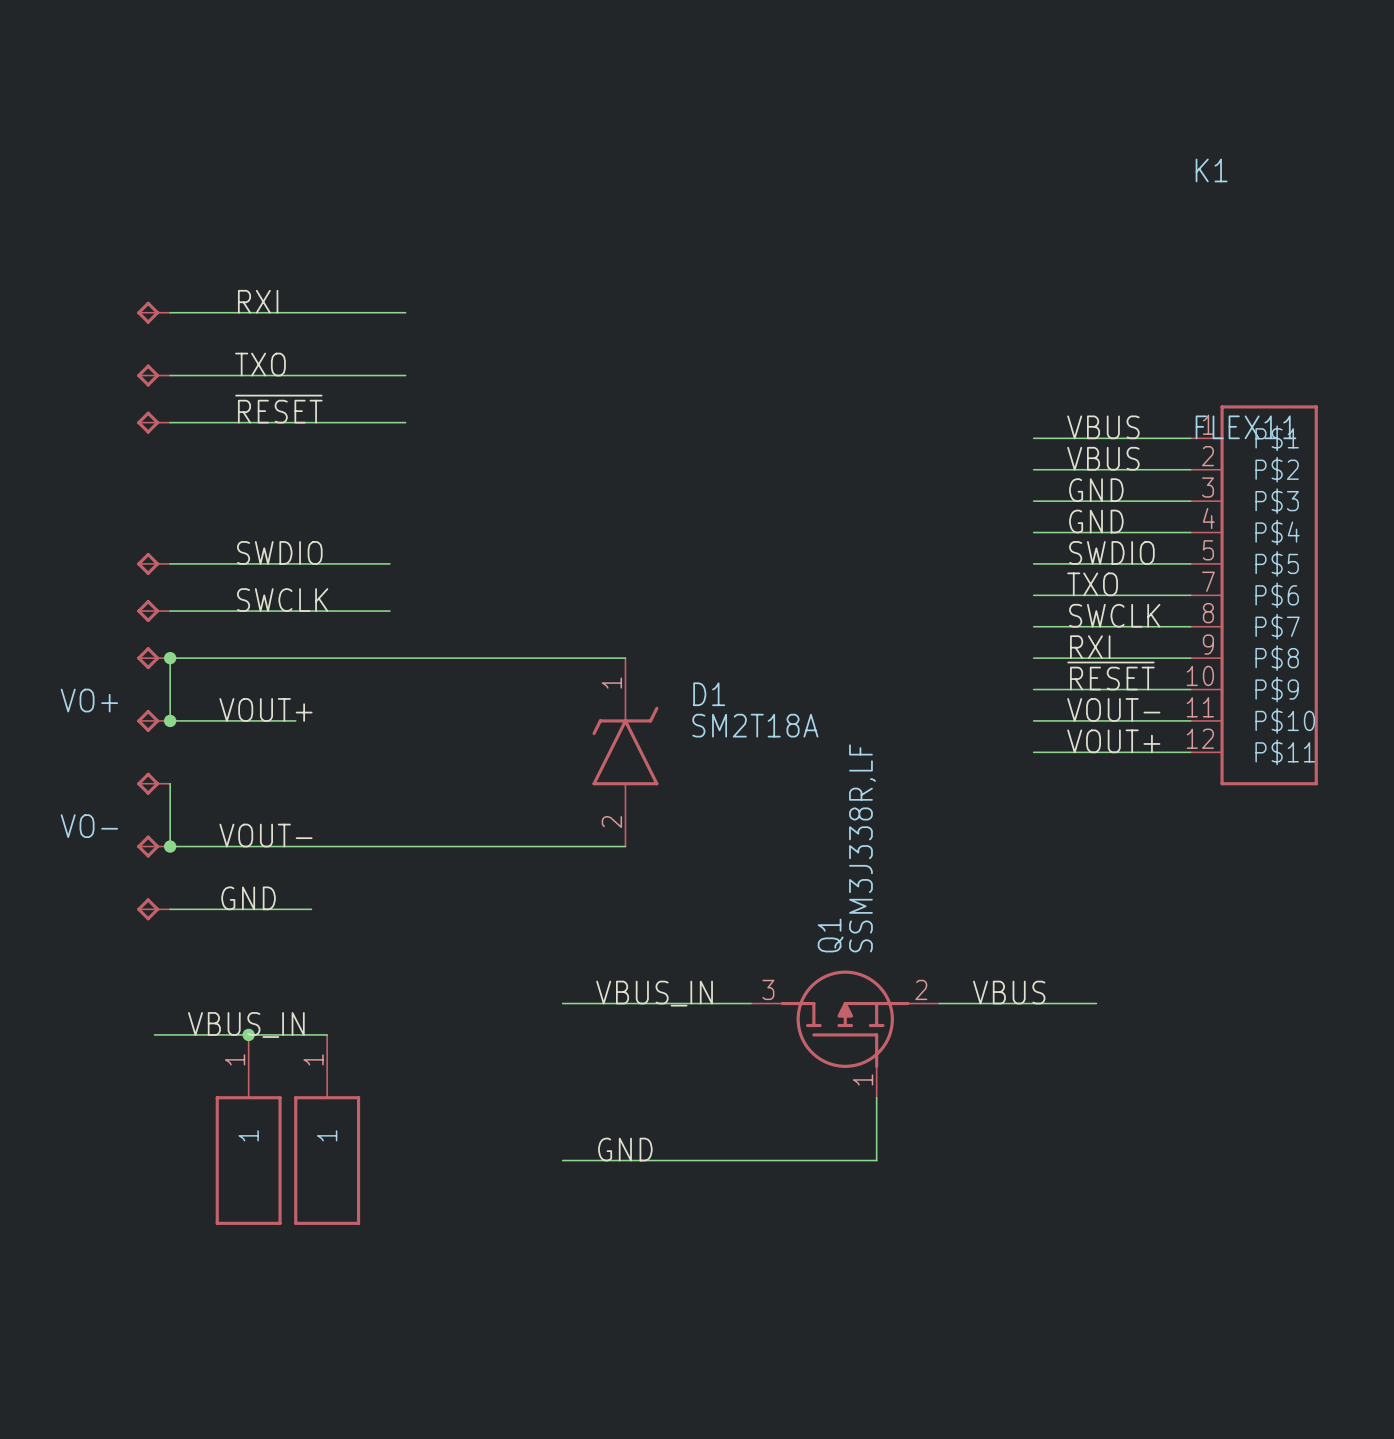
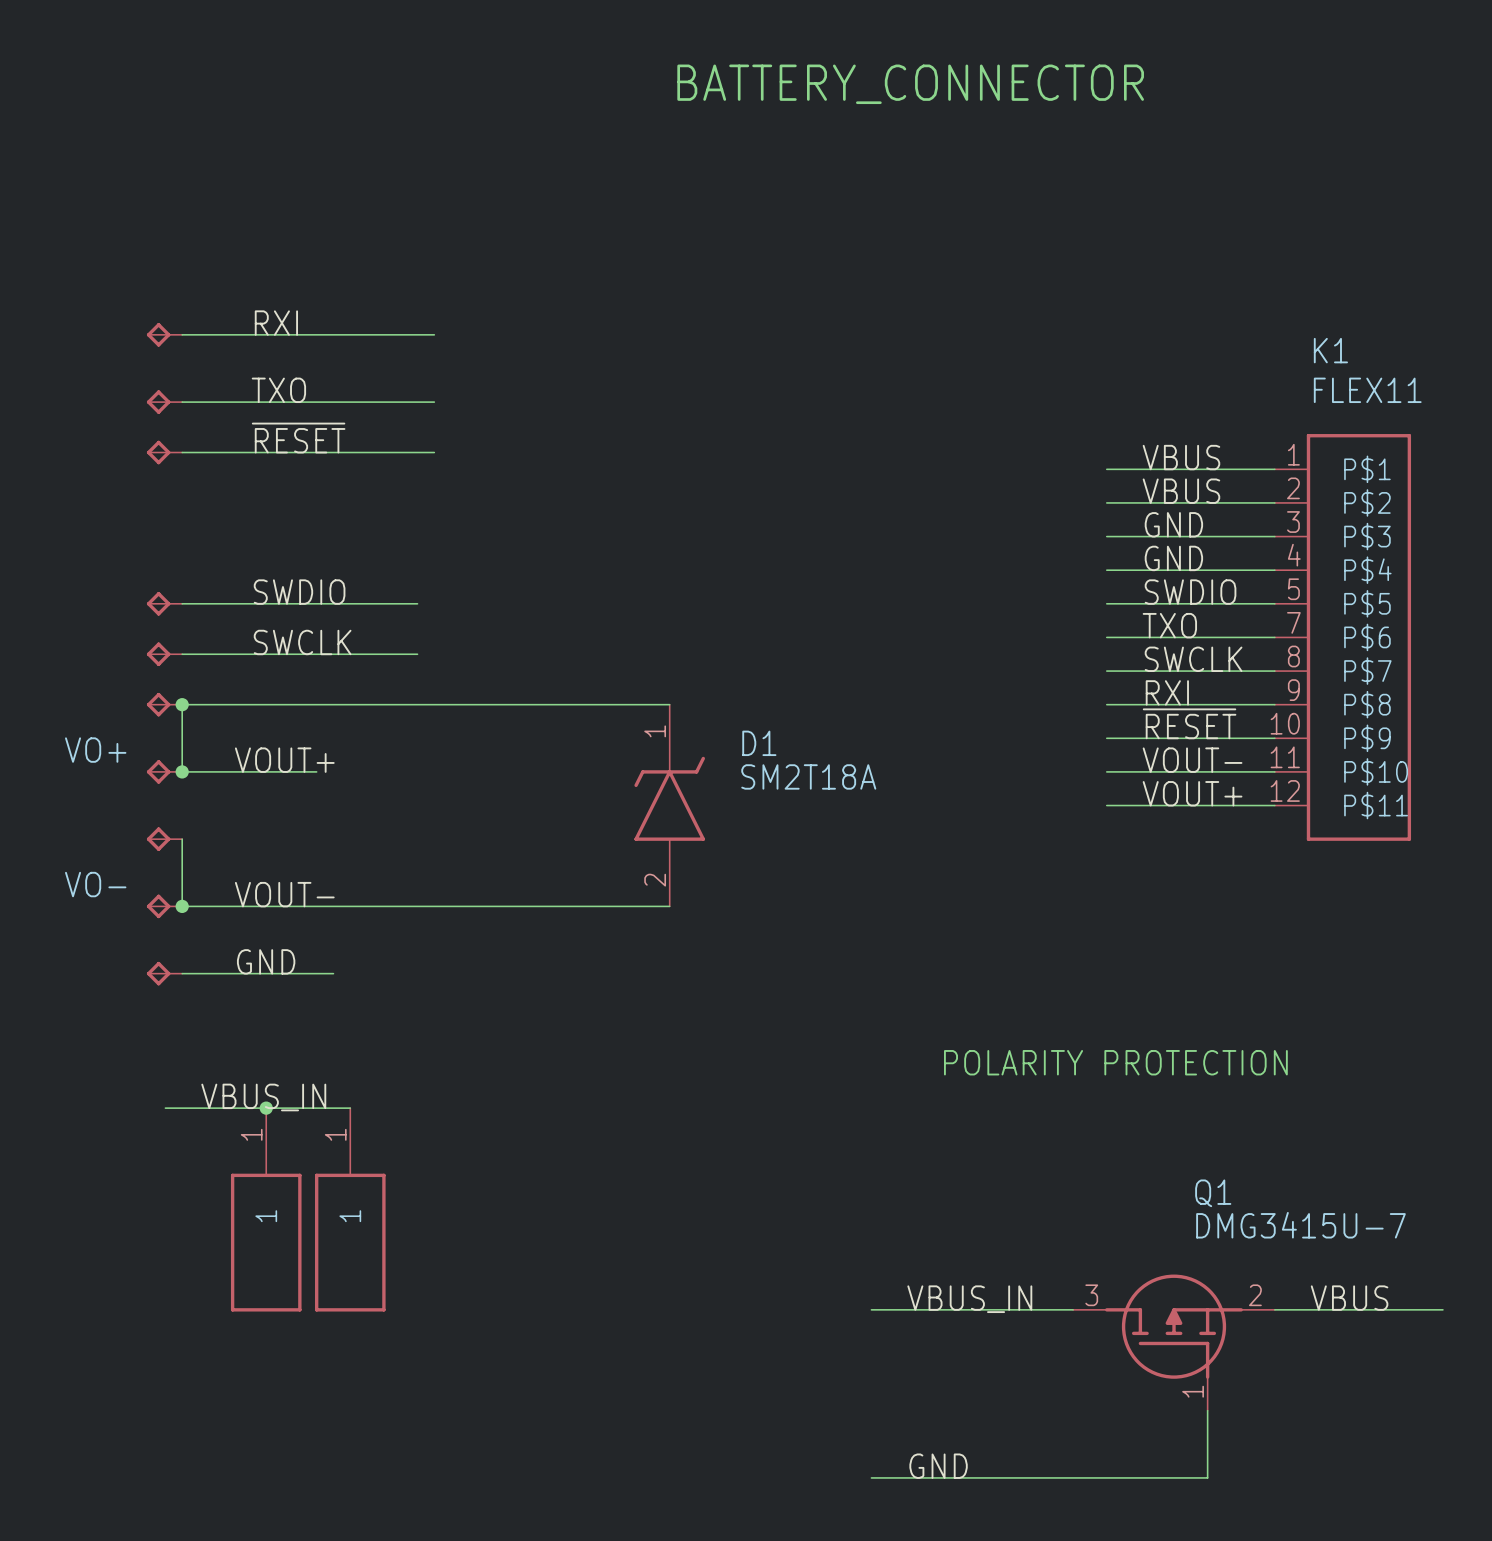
text: none -> BATTERY_CONNECTOR (910, 84)
K1 name position: K1 (1211, 170) -> K1 (1330, 350)
K1 value position: FLEX11 (1245, 427) -> FLEX11 (1367, 390)
Q1 value: SSM3J338R,LF (862, 848) -> DMG3415U-7 (1300, 1225)
Q1 name rotation: 0° (830, 935) -> 90° clockwise (1213, 1193)
Q1 name position: Q1 (830, 935) -> Q1 (1213, 1193)
label: VBUS (1009, 992) -> none
text: none -> POLARITY PROTECTION (1115, 1062)
label: VBUS_IN (654, 993) -> none
wire: (562, 1003) (751, 1003) -> none
wire: (939, 1003) (1096, 1003) -> none
Q1 position: (845, 1034) -> (1174, 1342)
wire: (876, 1097) (876, 1160) (562, 1160) -> none
label: GND (625, 1149) -> none
label: none -> VBUS (1349, 1298)
label: none -> VBUS_IN (969, 1299)
wire: none -> (871, 1309) (1073, 1309)
wire: none -> (1274, 1309) (1442, 1309)
wire: none -> (1207, 1410) (1207, 1477) (871, 1477)
label: none -> GND (938, 1466)

